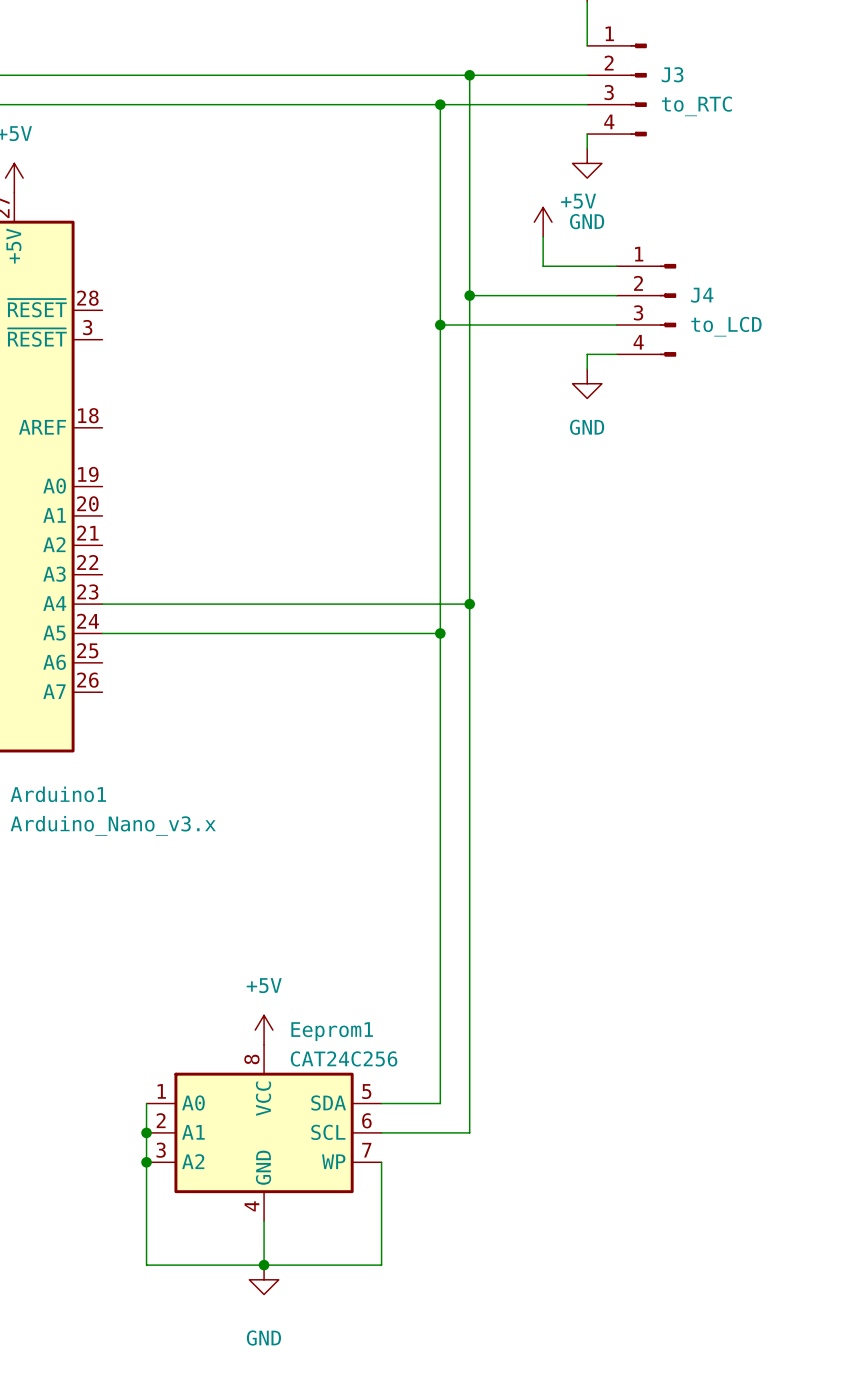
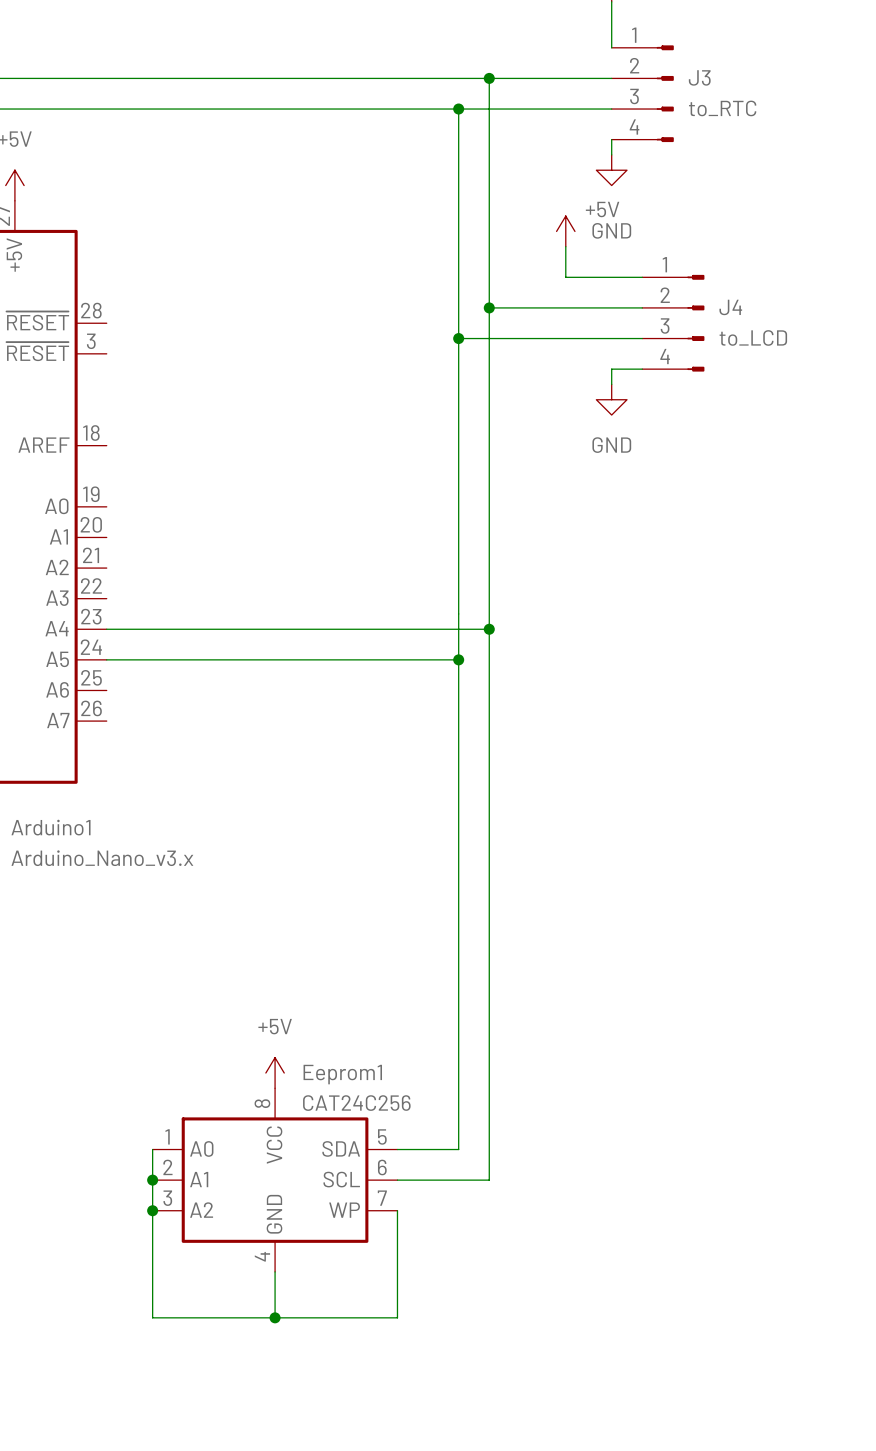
power symbol: GND (264, 1279) -> none

